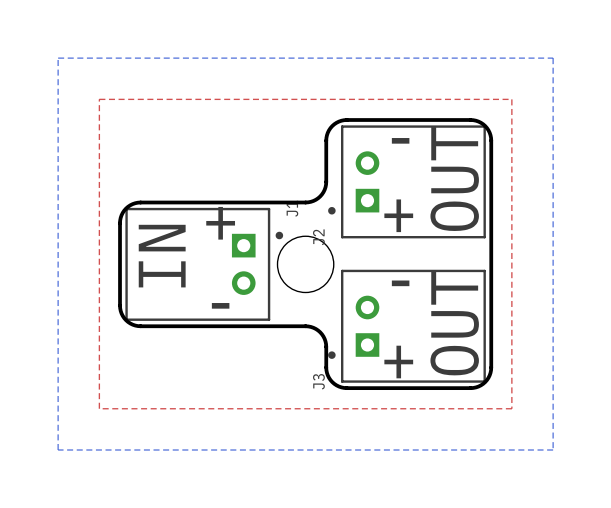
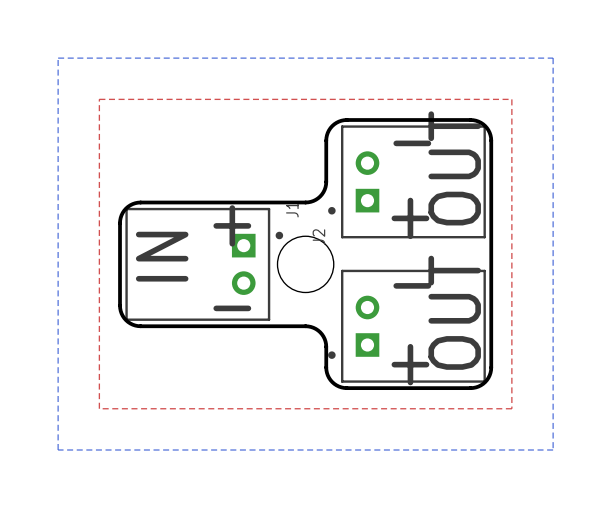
J3 name: J3 (318, 381) -> none

